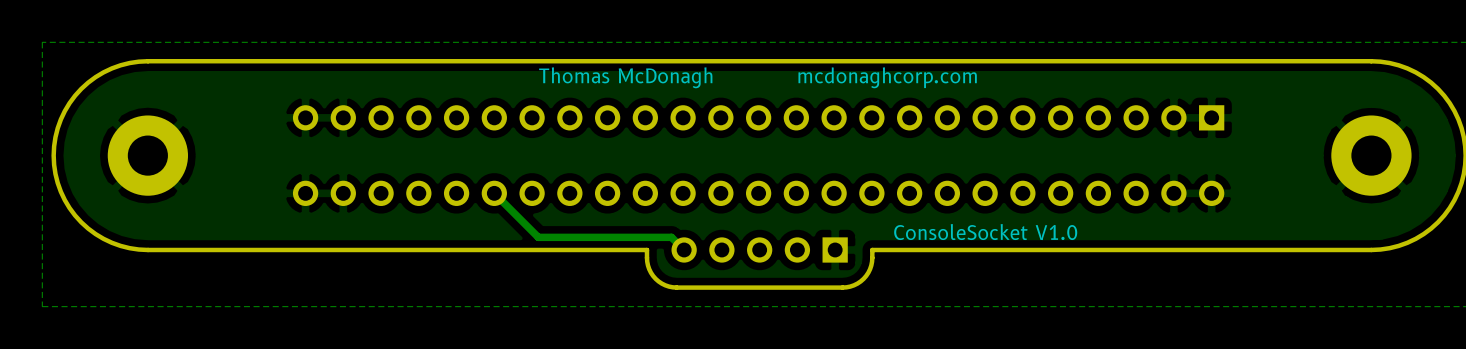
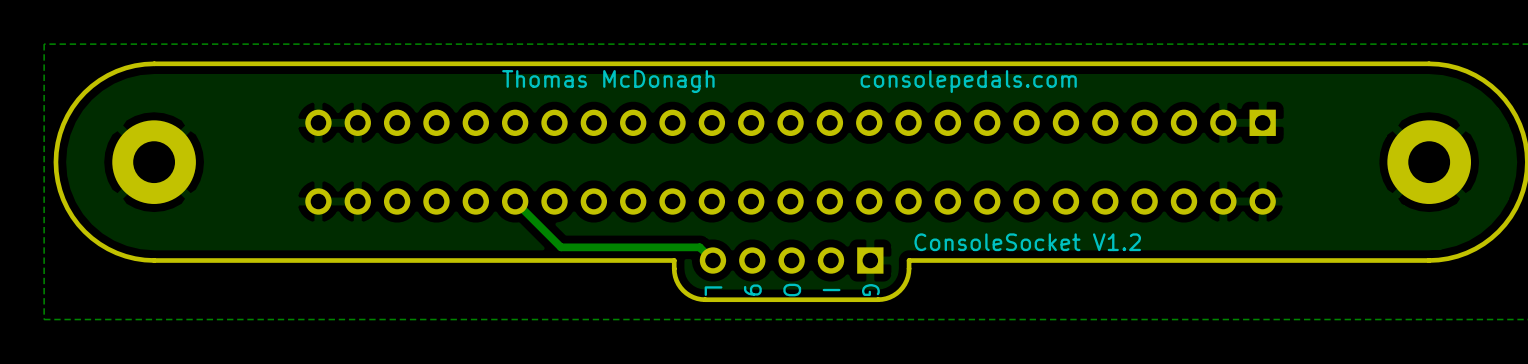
text: Thomas McDonagh mcdonaghcorp.com (757, 77) -> Thomas McDonagh consolepedals.com (789, 81)
text: ConsoleSocket V1.0 (985, 232) -> ConsoleSocket V1.2 (1027, 242)
text: none -> L (713, 291)
text: none -> 9 (752, 290)
text: none -> O (792, 290)
text: none -> I (831, 290)
text: none -> G (870, 290)

